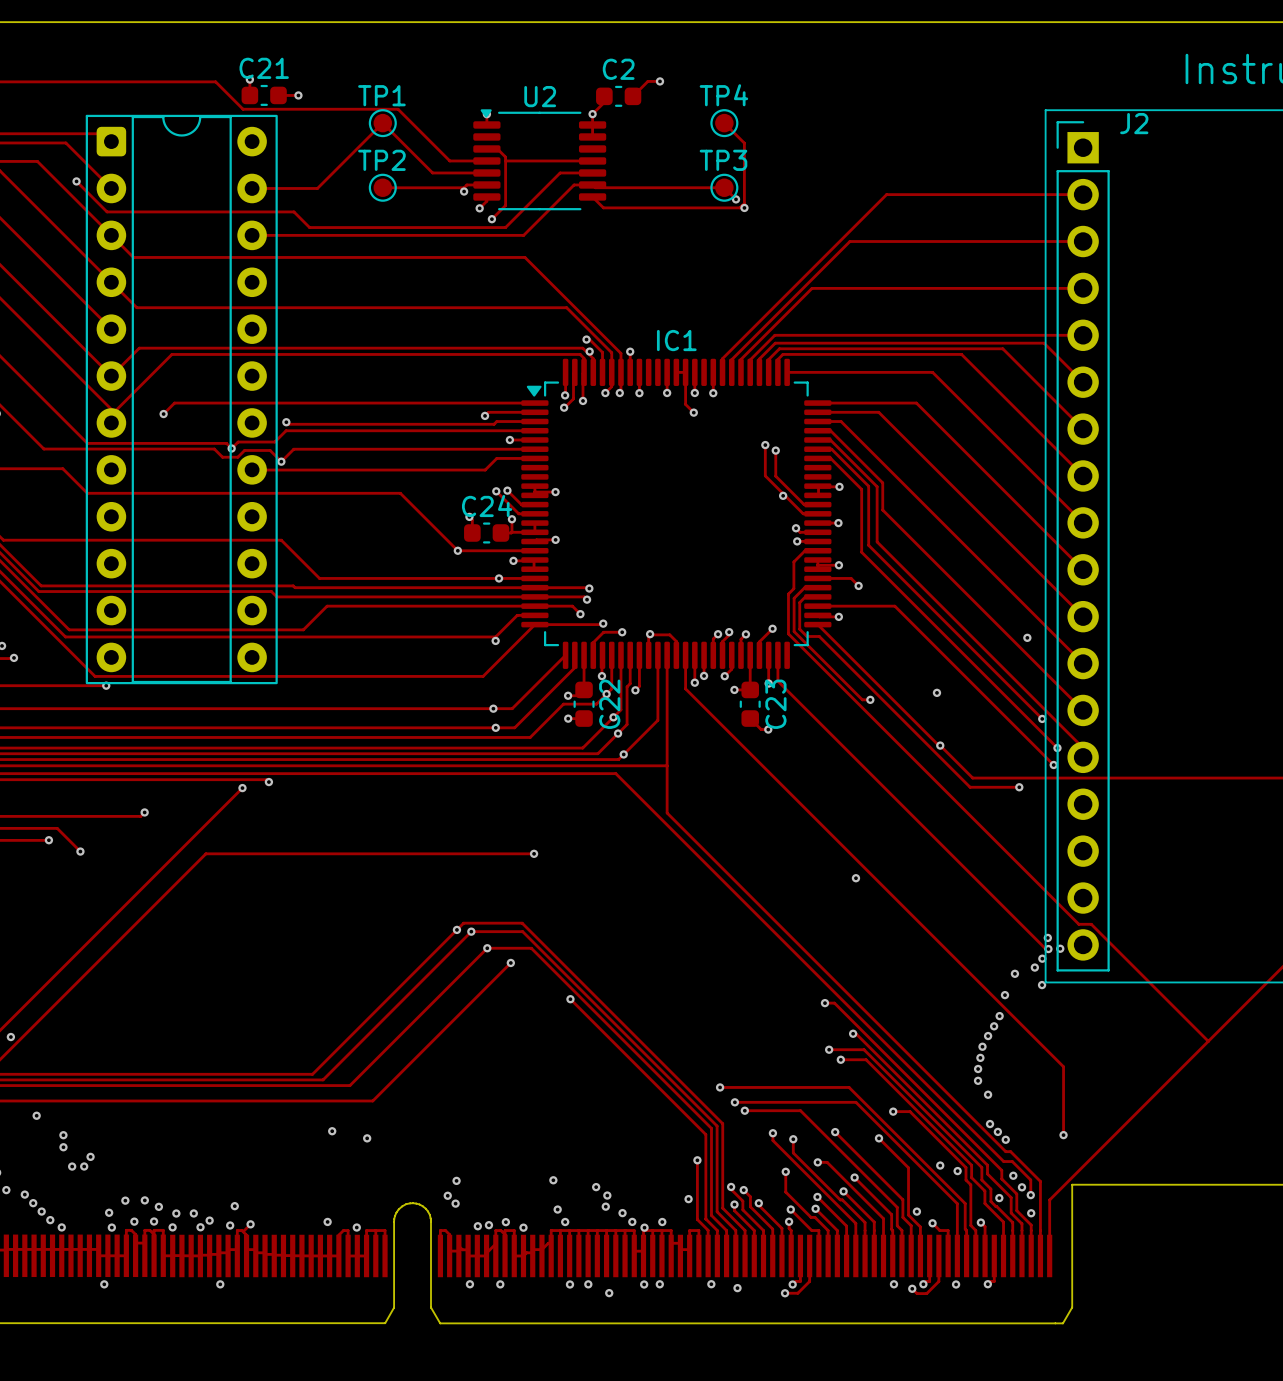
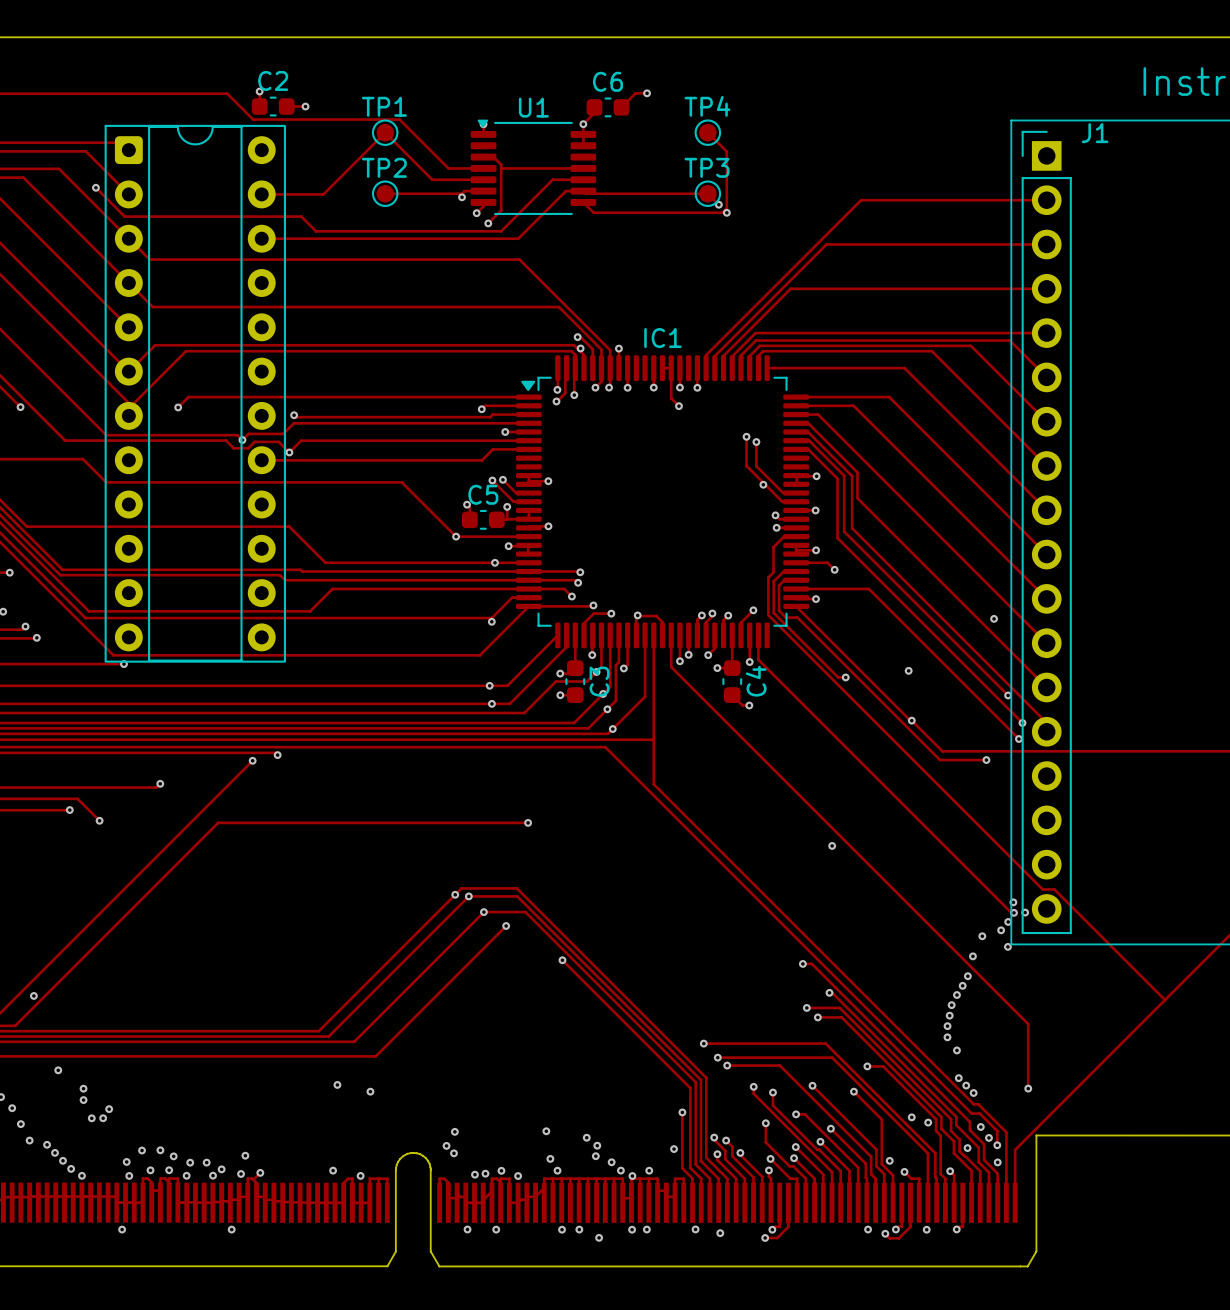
C21 name: C21 (264, 68) -> C2 (273, 80)
C2 name: C2 (618, 69) -> C6 (608, 81)
U2 name: U2 (540, 96) -> U1 (533, 107)
J2 name: J2 (1134, 123) -> J1 (1095, 133)
C24 name: C24 (487, 506) -> C5 (483, 494)
C22 name: C22 (609, 704) -> C3 (599, 681)
C23 name: C23 (775, 704) -> C4 (756, 681)

